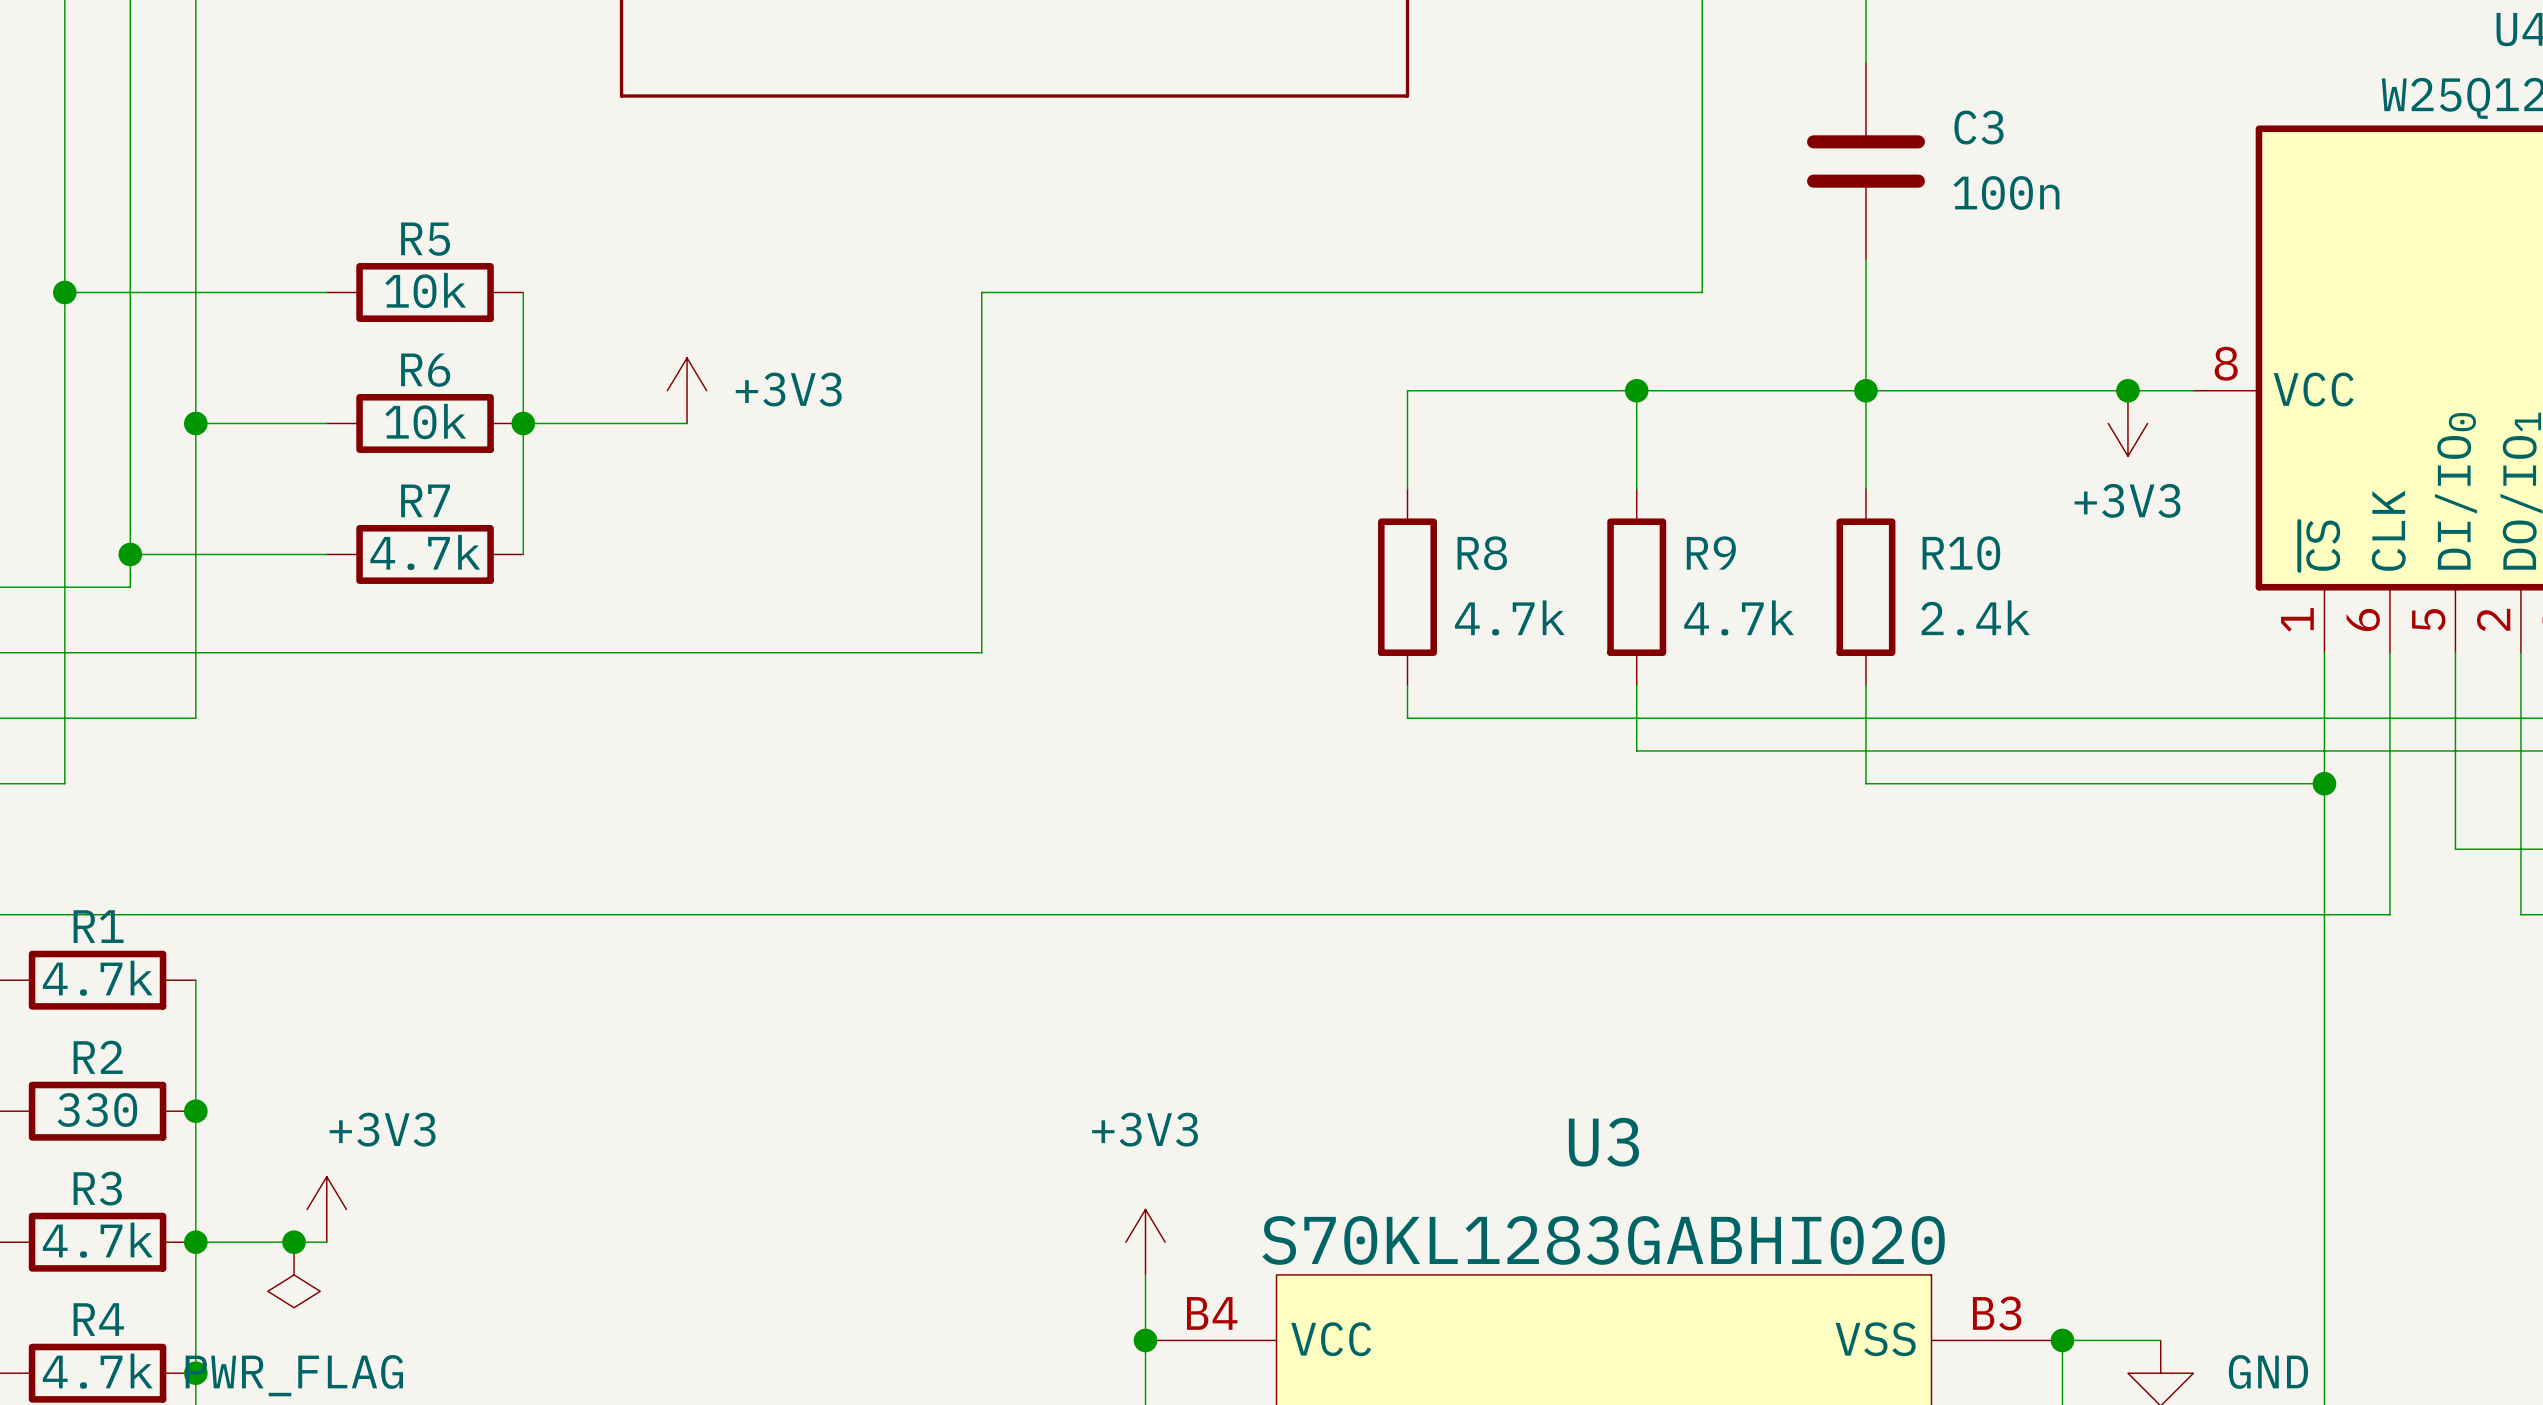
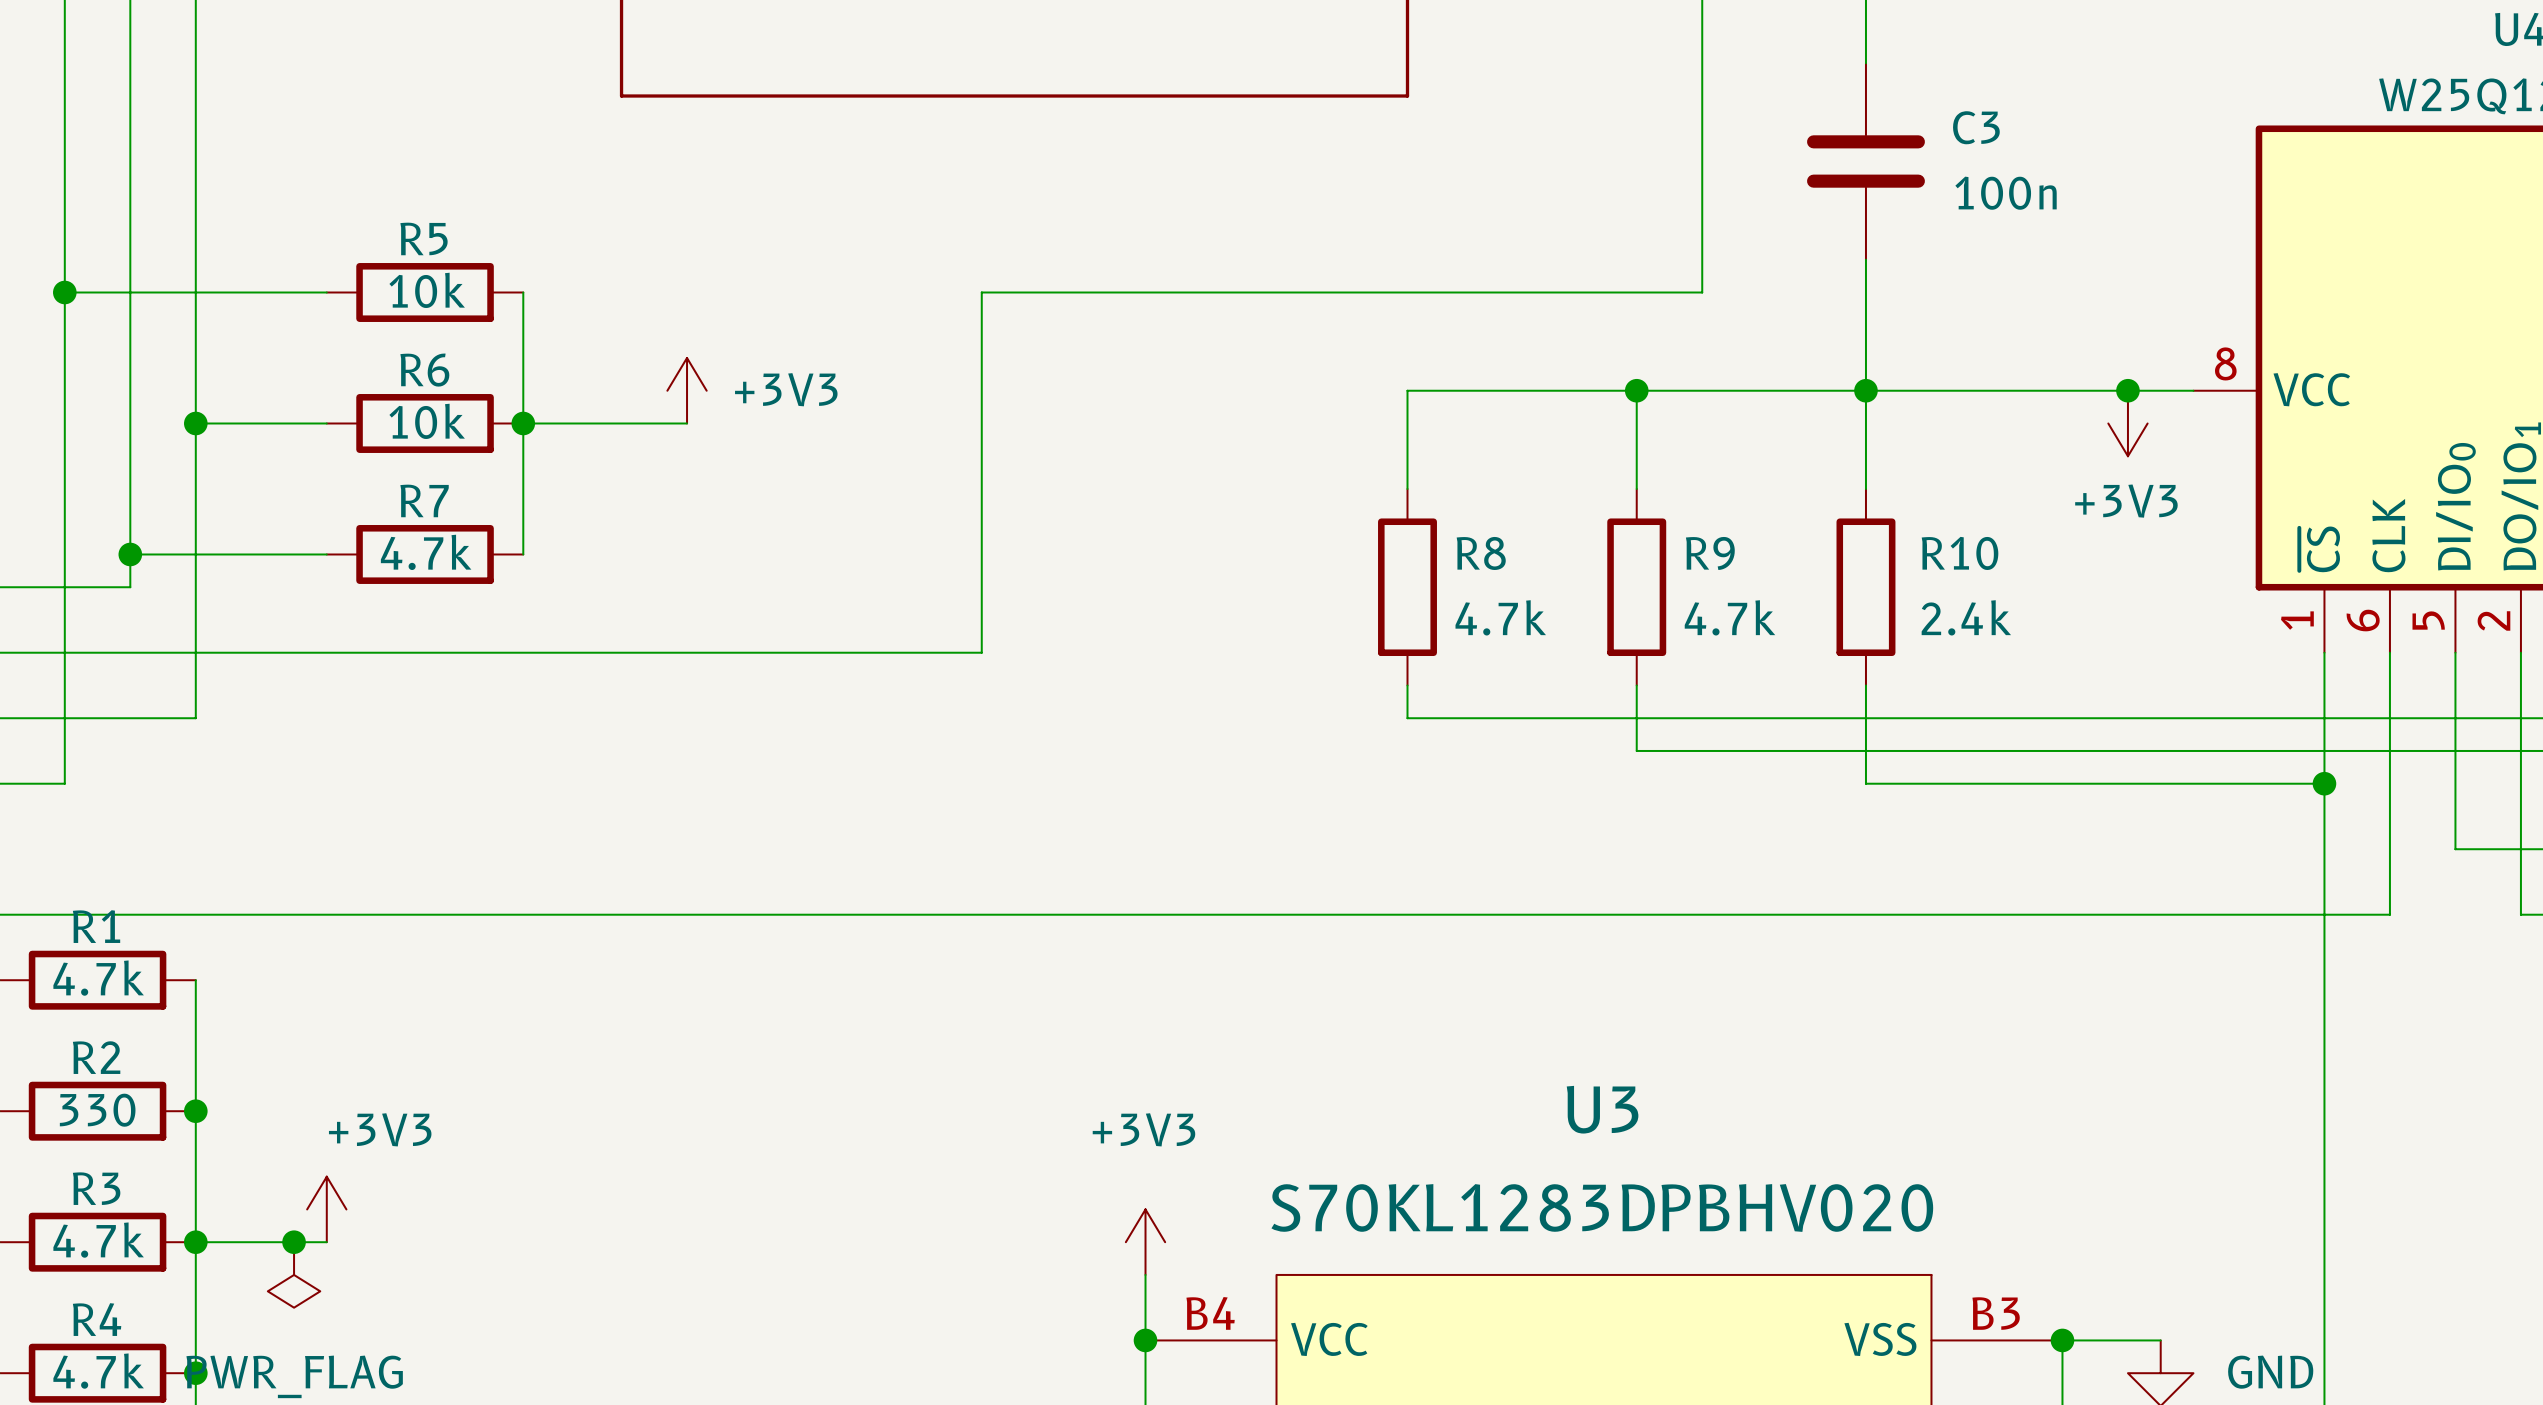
U3 name position: U3 (1603, 1142) -> U3 (1602, 1109)
U3 value: S70KL1283GABHI020 (1603, 1240) -> S70KL1283DPBHV020 (1602, 1208)

